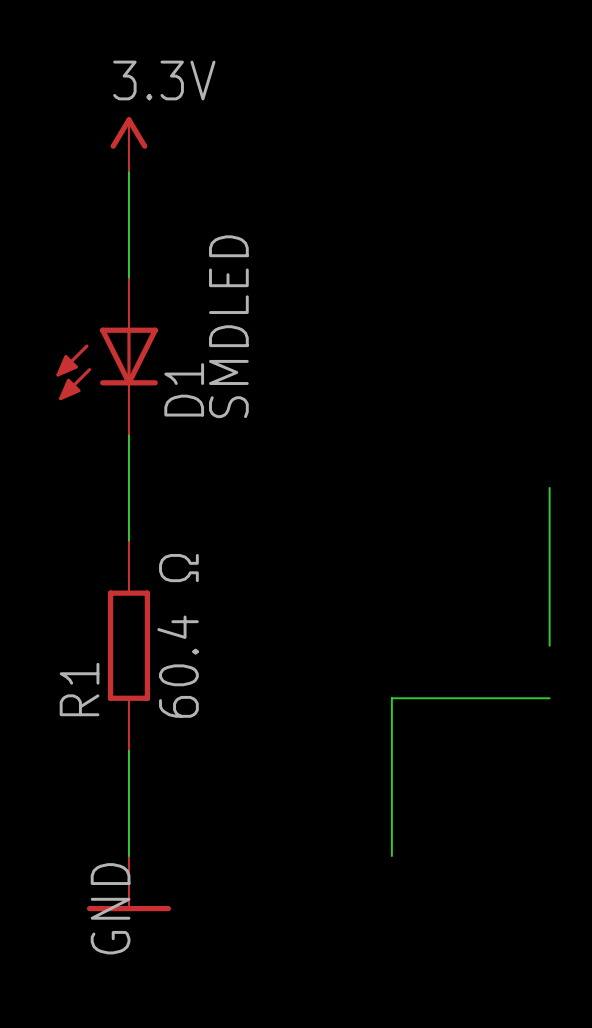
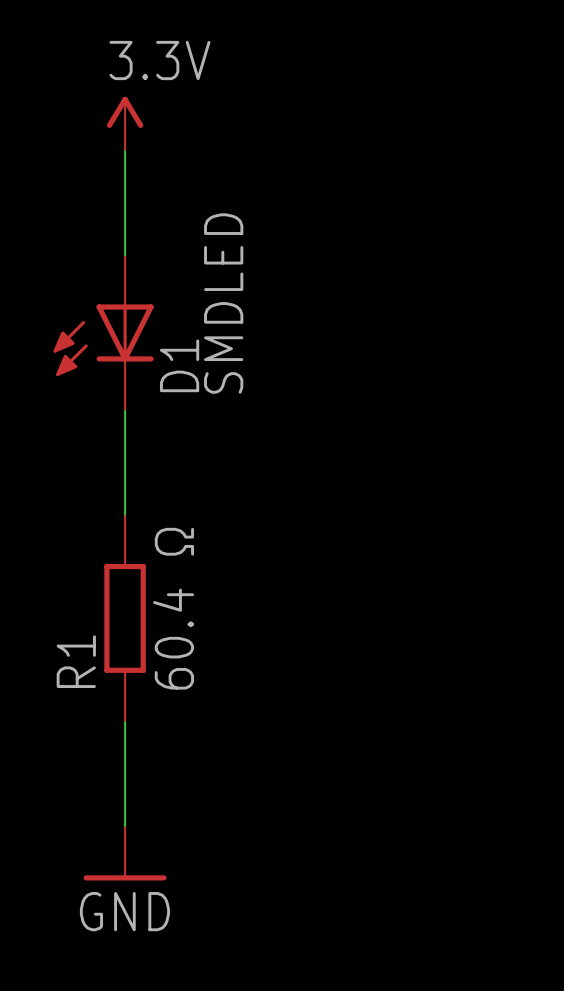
wire: (549, 487) (549, 645) -> none
wire: (549, 698) (391, 698) (391, 856) -> none
power symbol text rotation: 0° (110, 908) -> 90° clockwise (124, 911)

